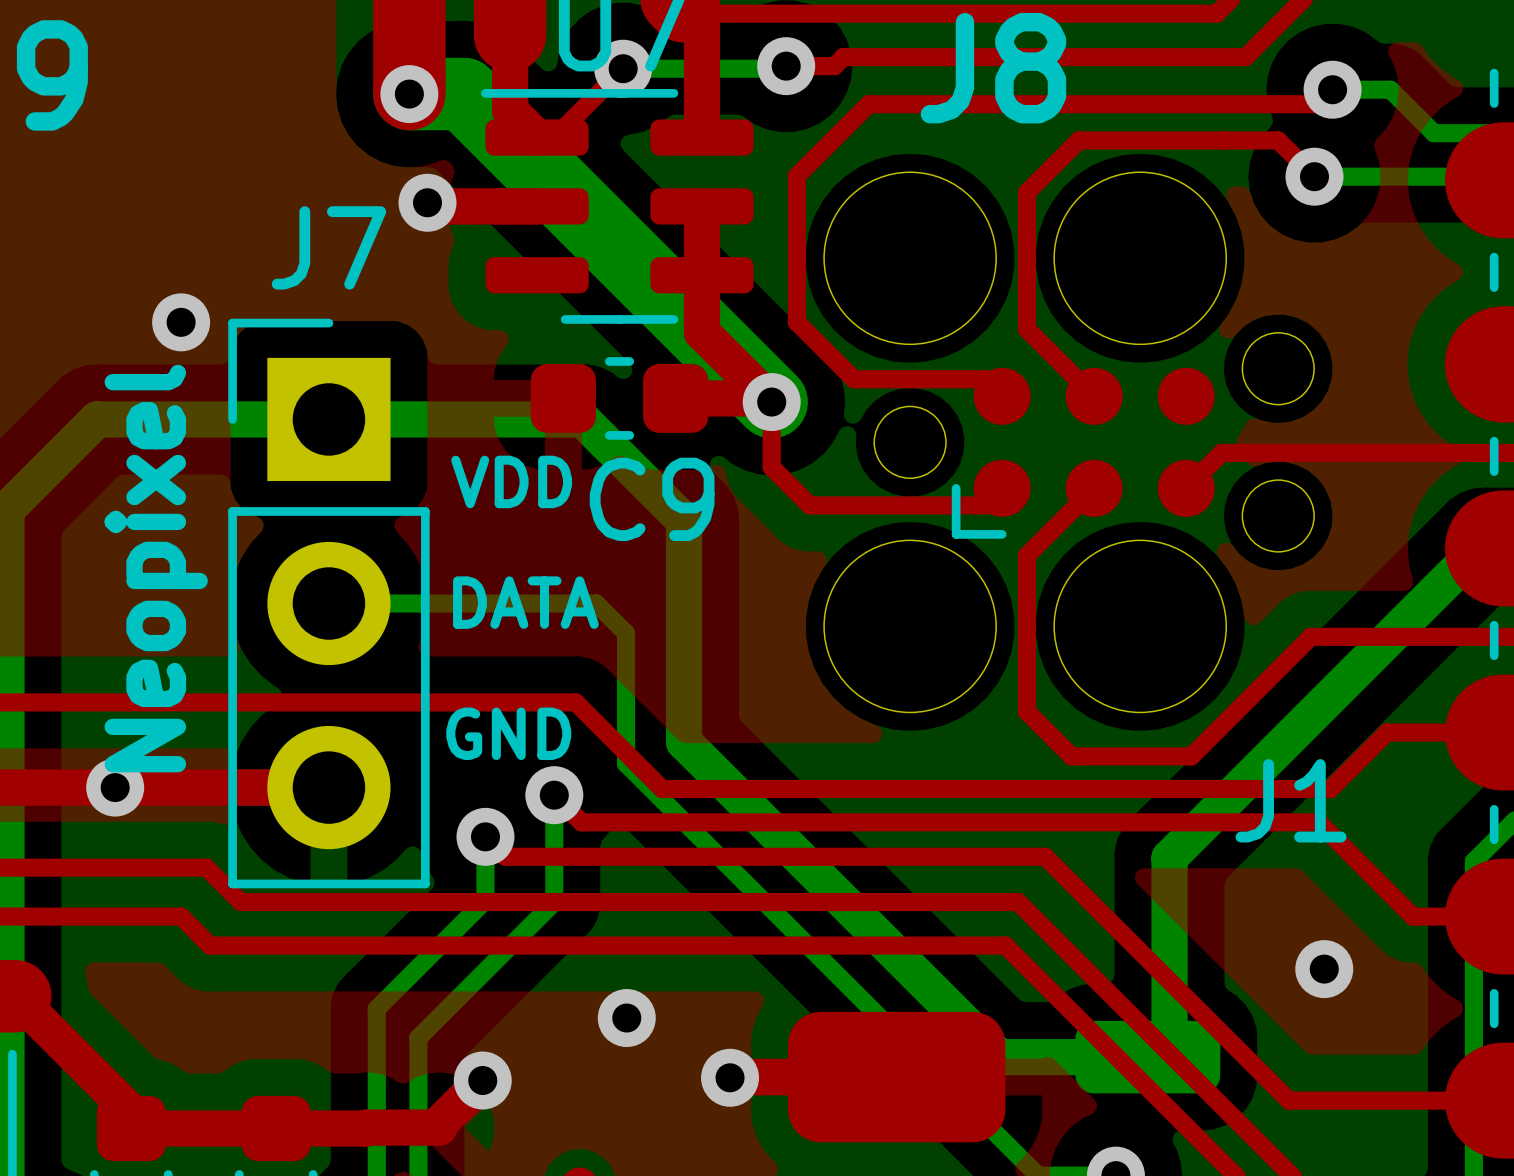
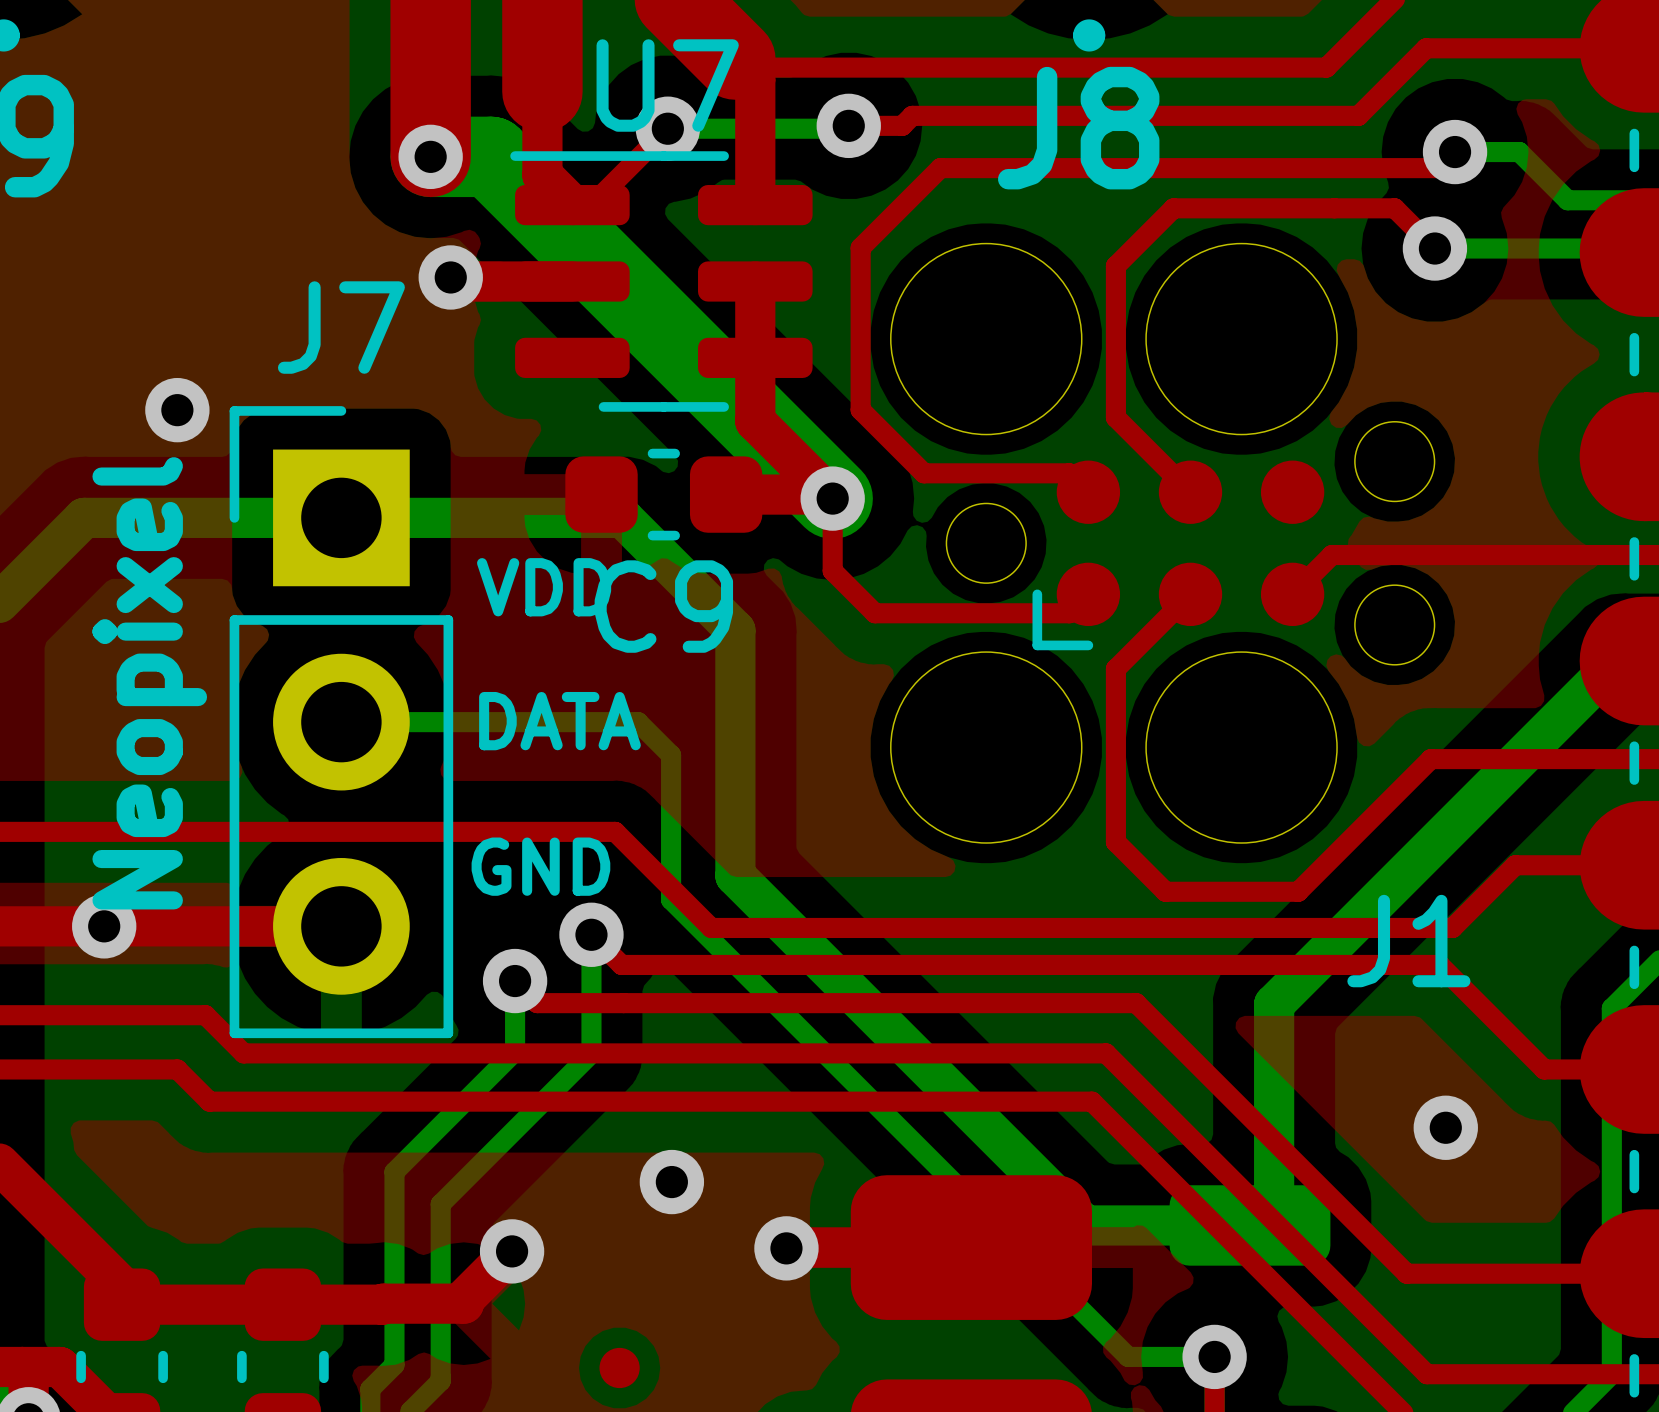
C9 name position: C9 (652, 499) -> C9 (663, 606)

